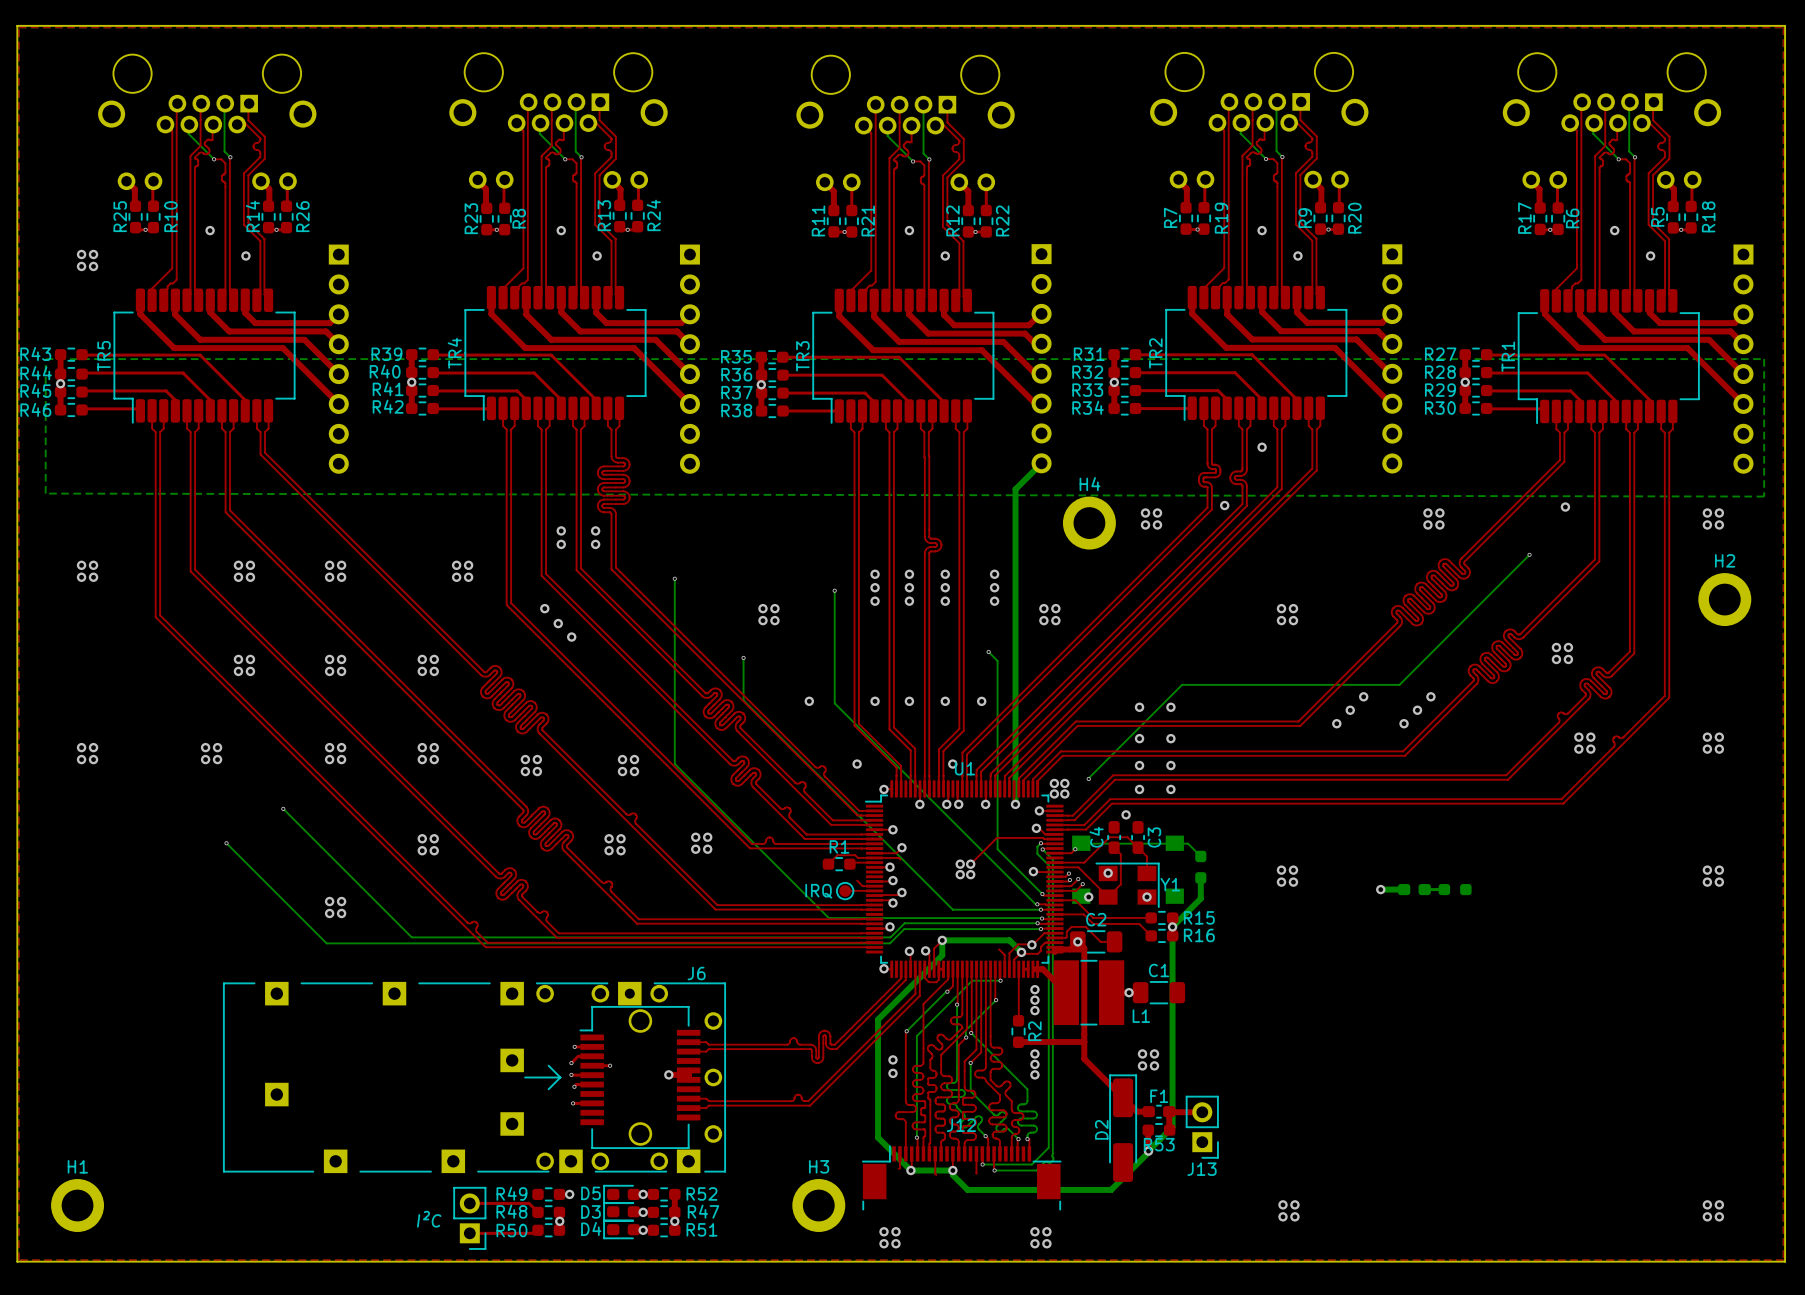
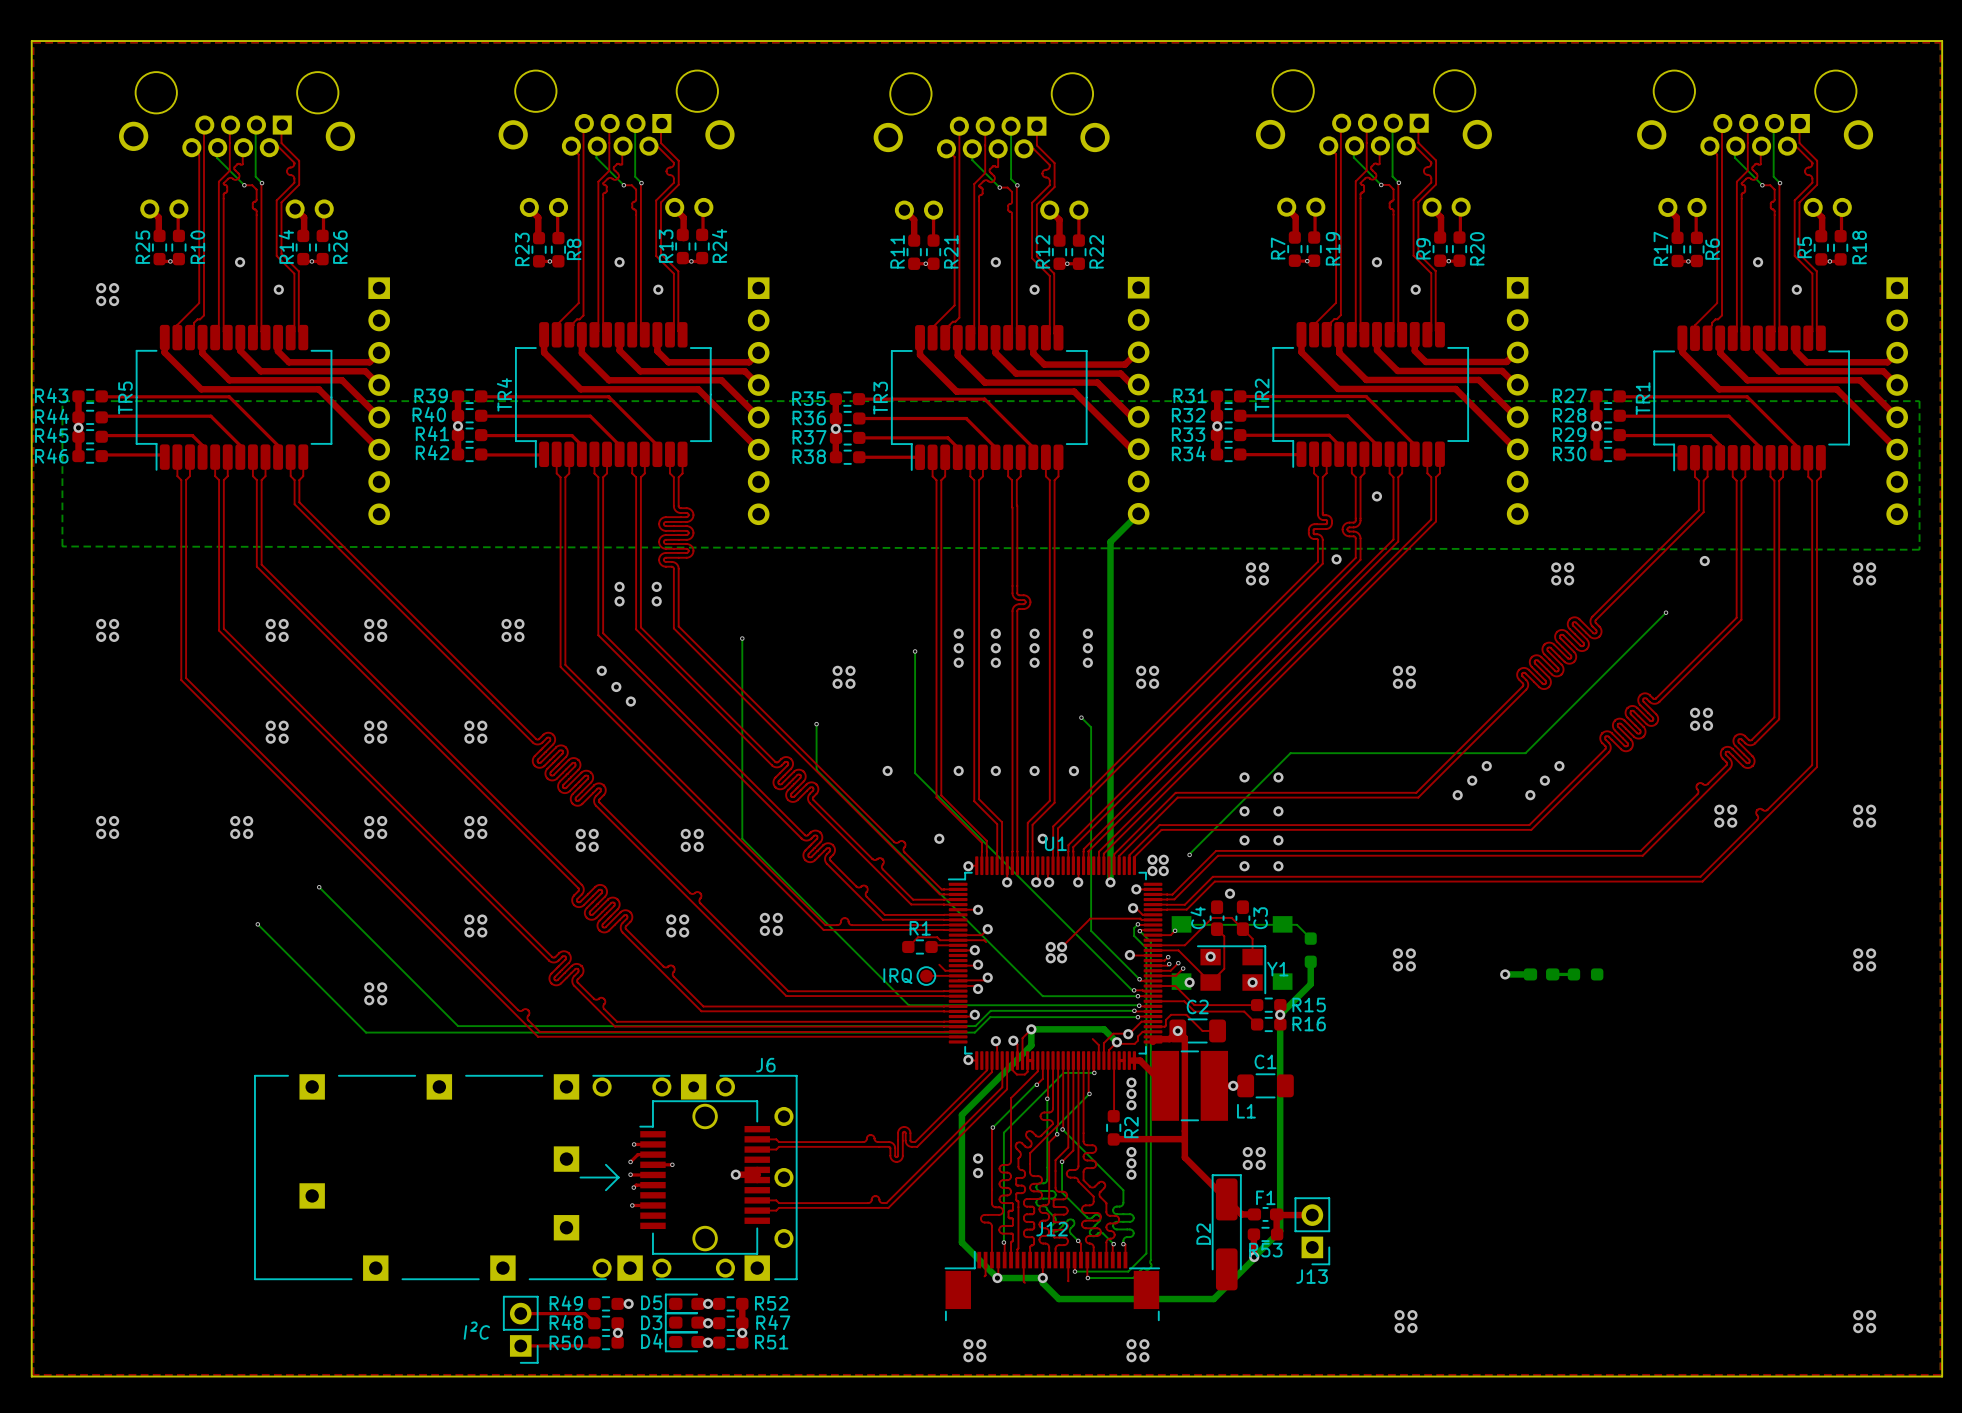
H4: (1089, 523) -> none
H2: (1724, 599) -> none
H1: (77, 1205) -> none
H3: (818, 1205) -> none

